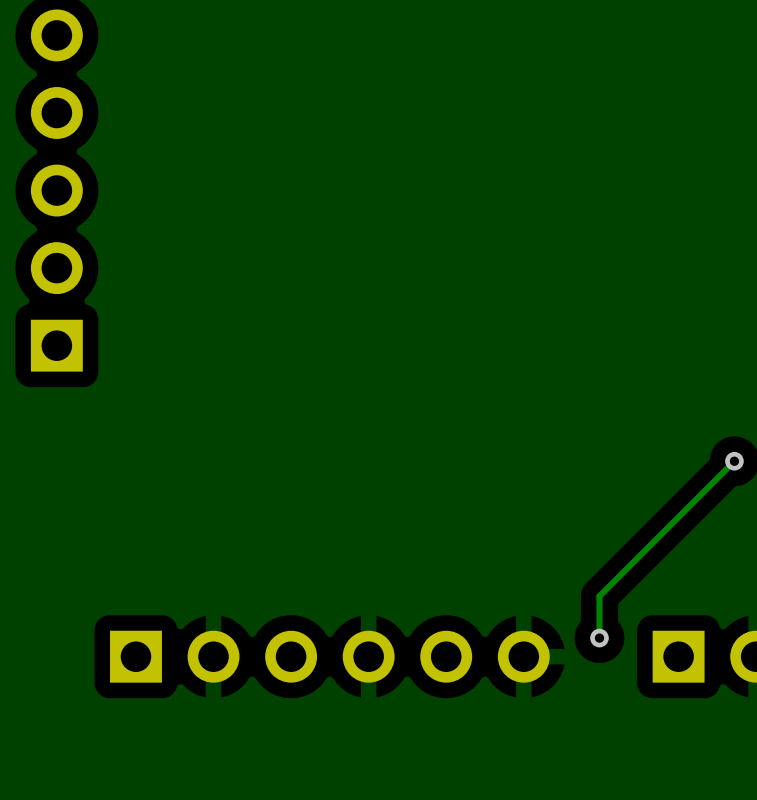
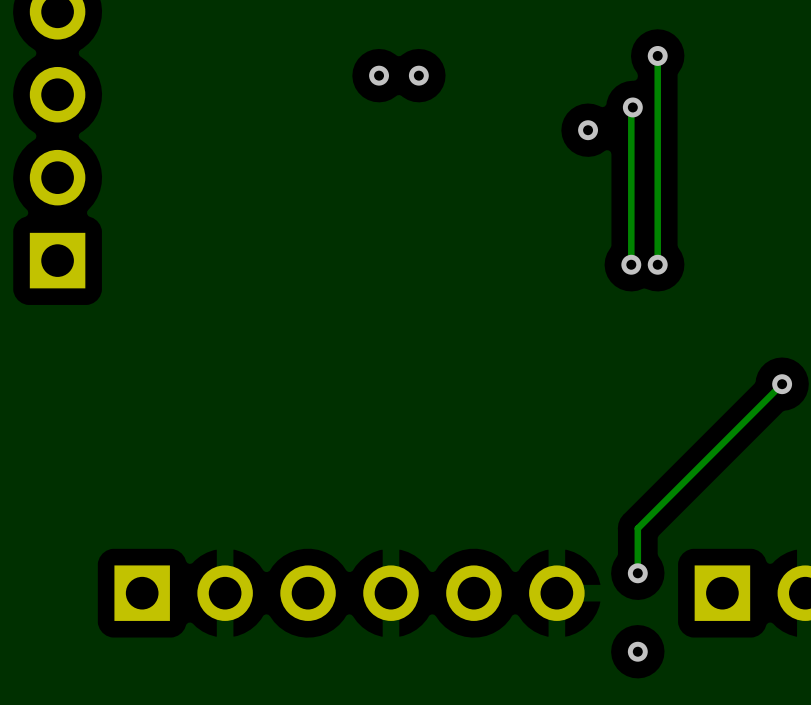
track: none -> (657, 55) (657, 269)
via: none -> (657, 55)
via: none -> (379, 75)
via: none -> (418, 75)
track: none -> (632, 107) (631, 108) (631, 269)
via: none -> (632, 107)
via: none -> (588, 130)
via: none -> (631, 264)
via: none -> (657, 264)
via: none -> (637, 651)

